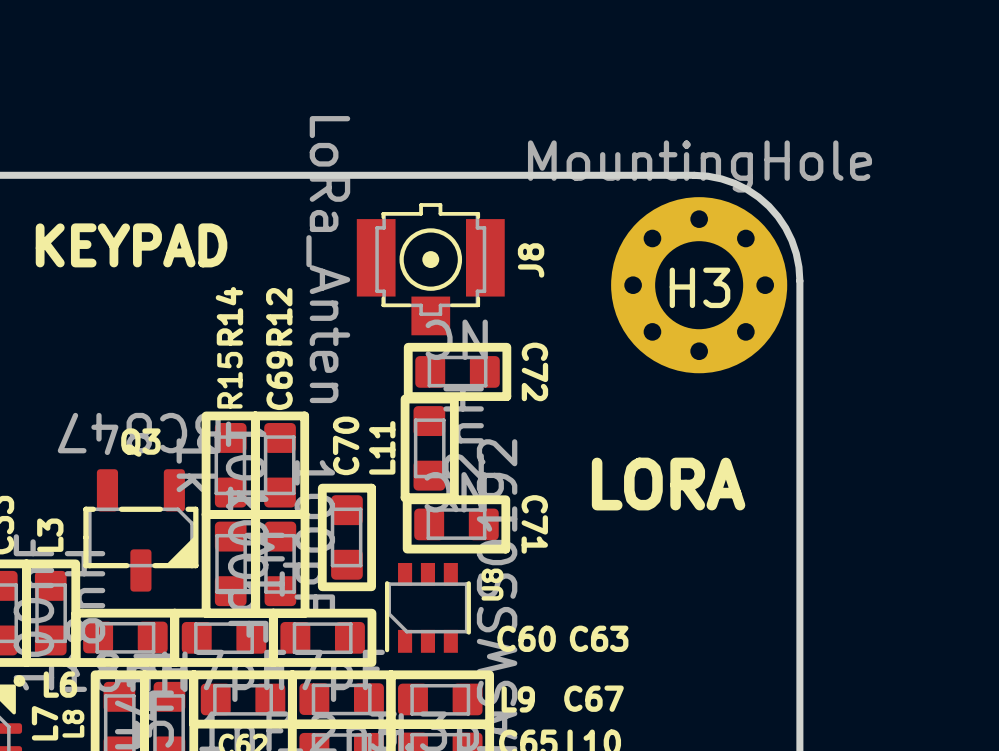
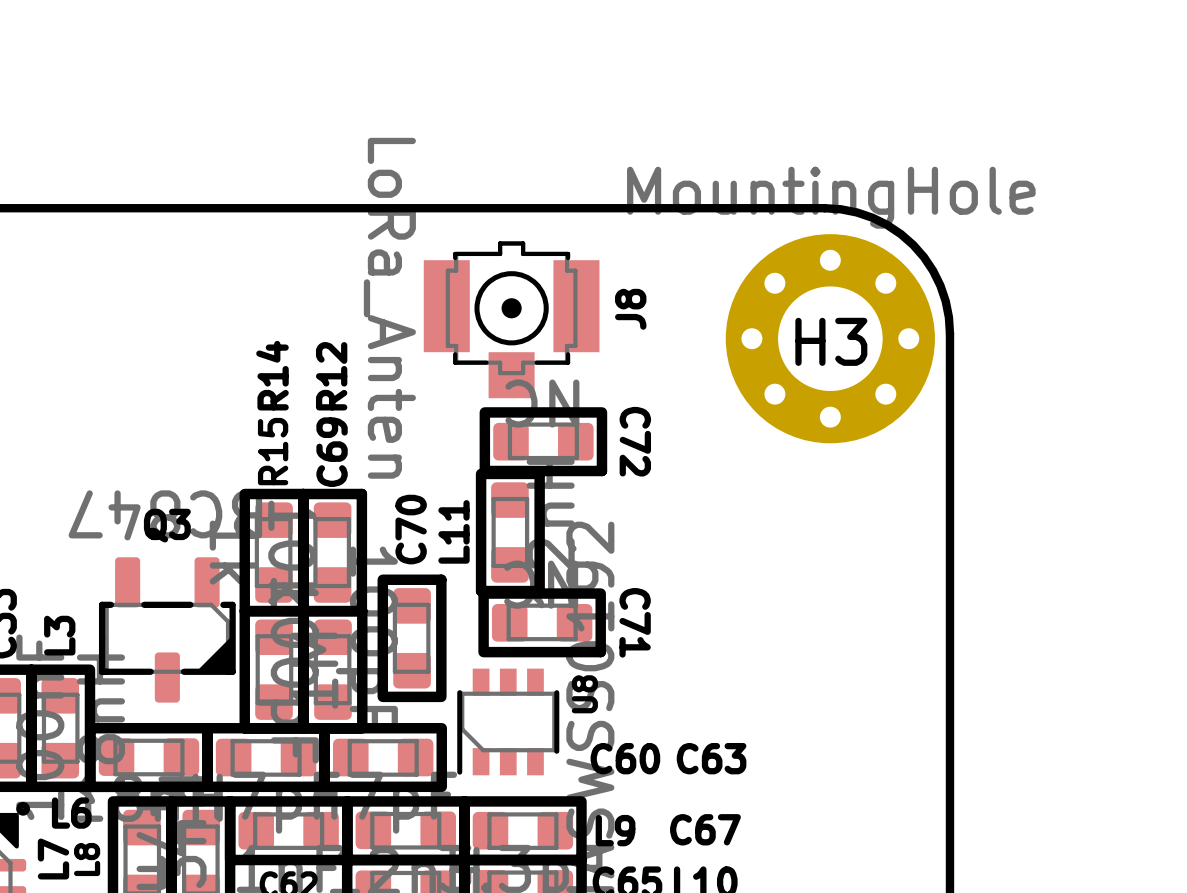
text: KEYPAD (131, 245) -> none
text: LORA (668, 484) -> none

